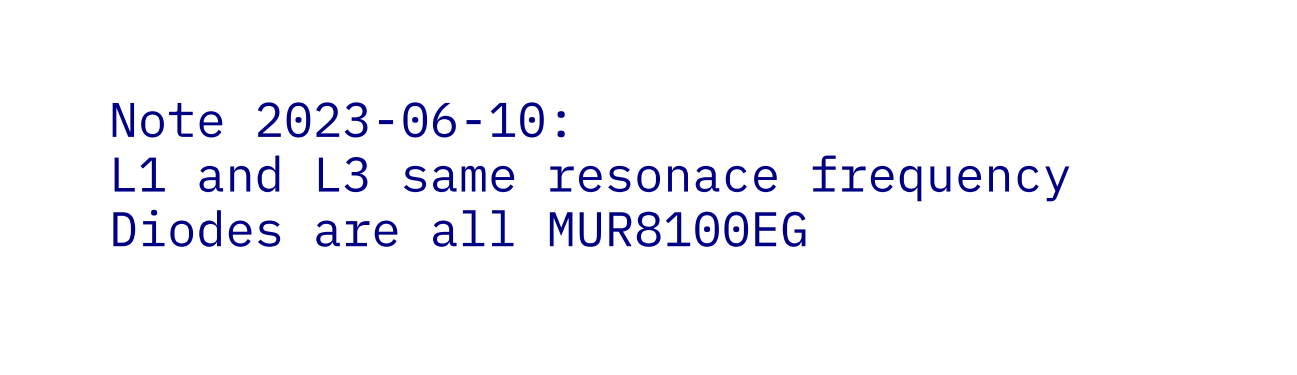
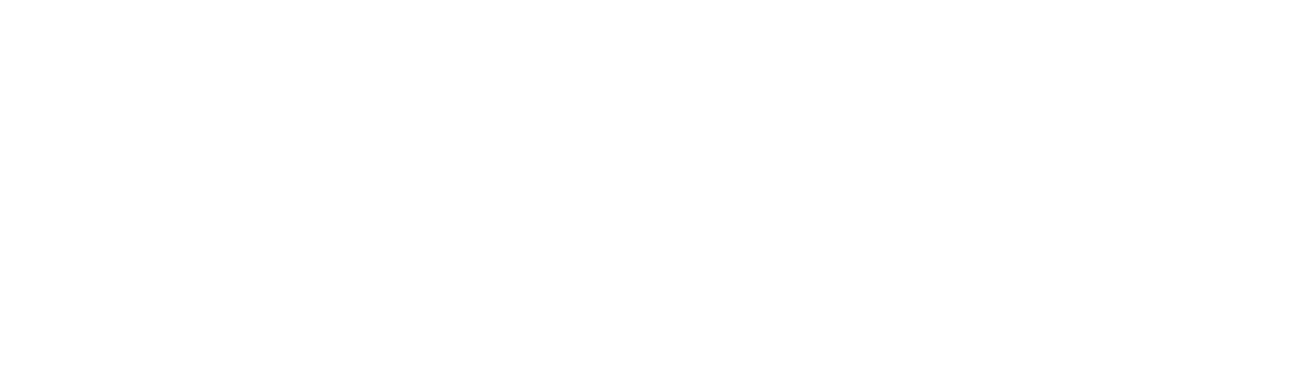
text: Note 2023-06-10: (338, 119) -> none
text: L1 and L3 same resonace frequency (591, 178) -> none
text: Diodes are all MUR8100EG (459, 228) -> none

